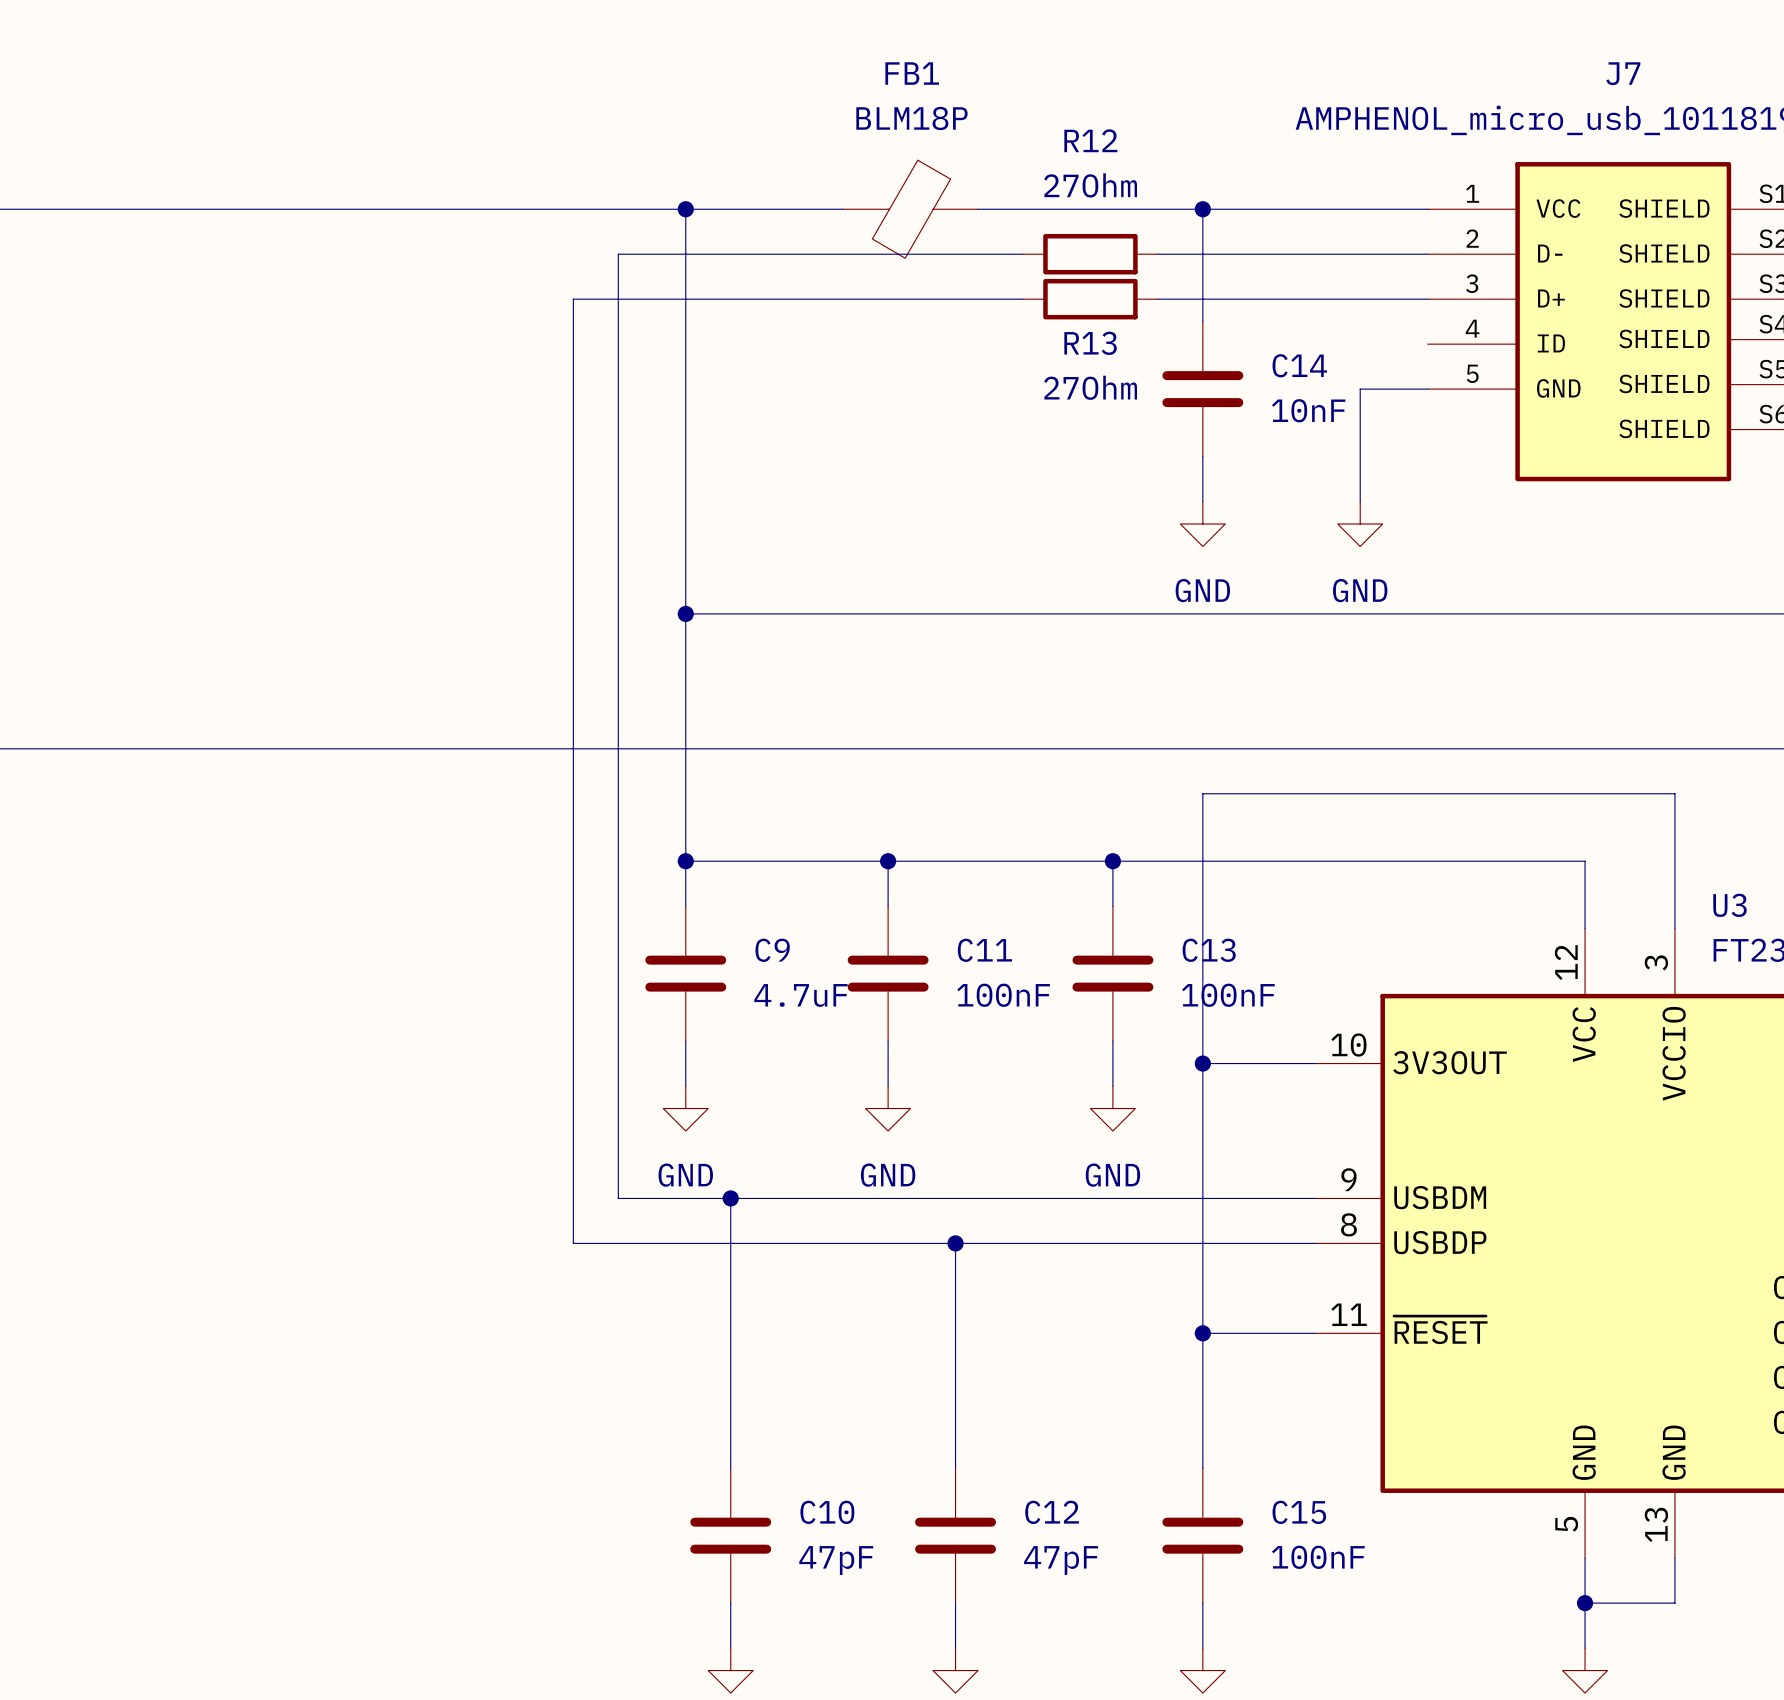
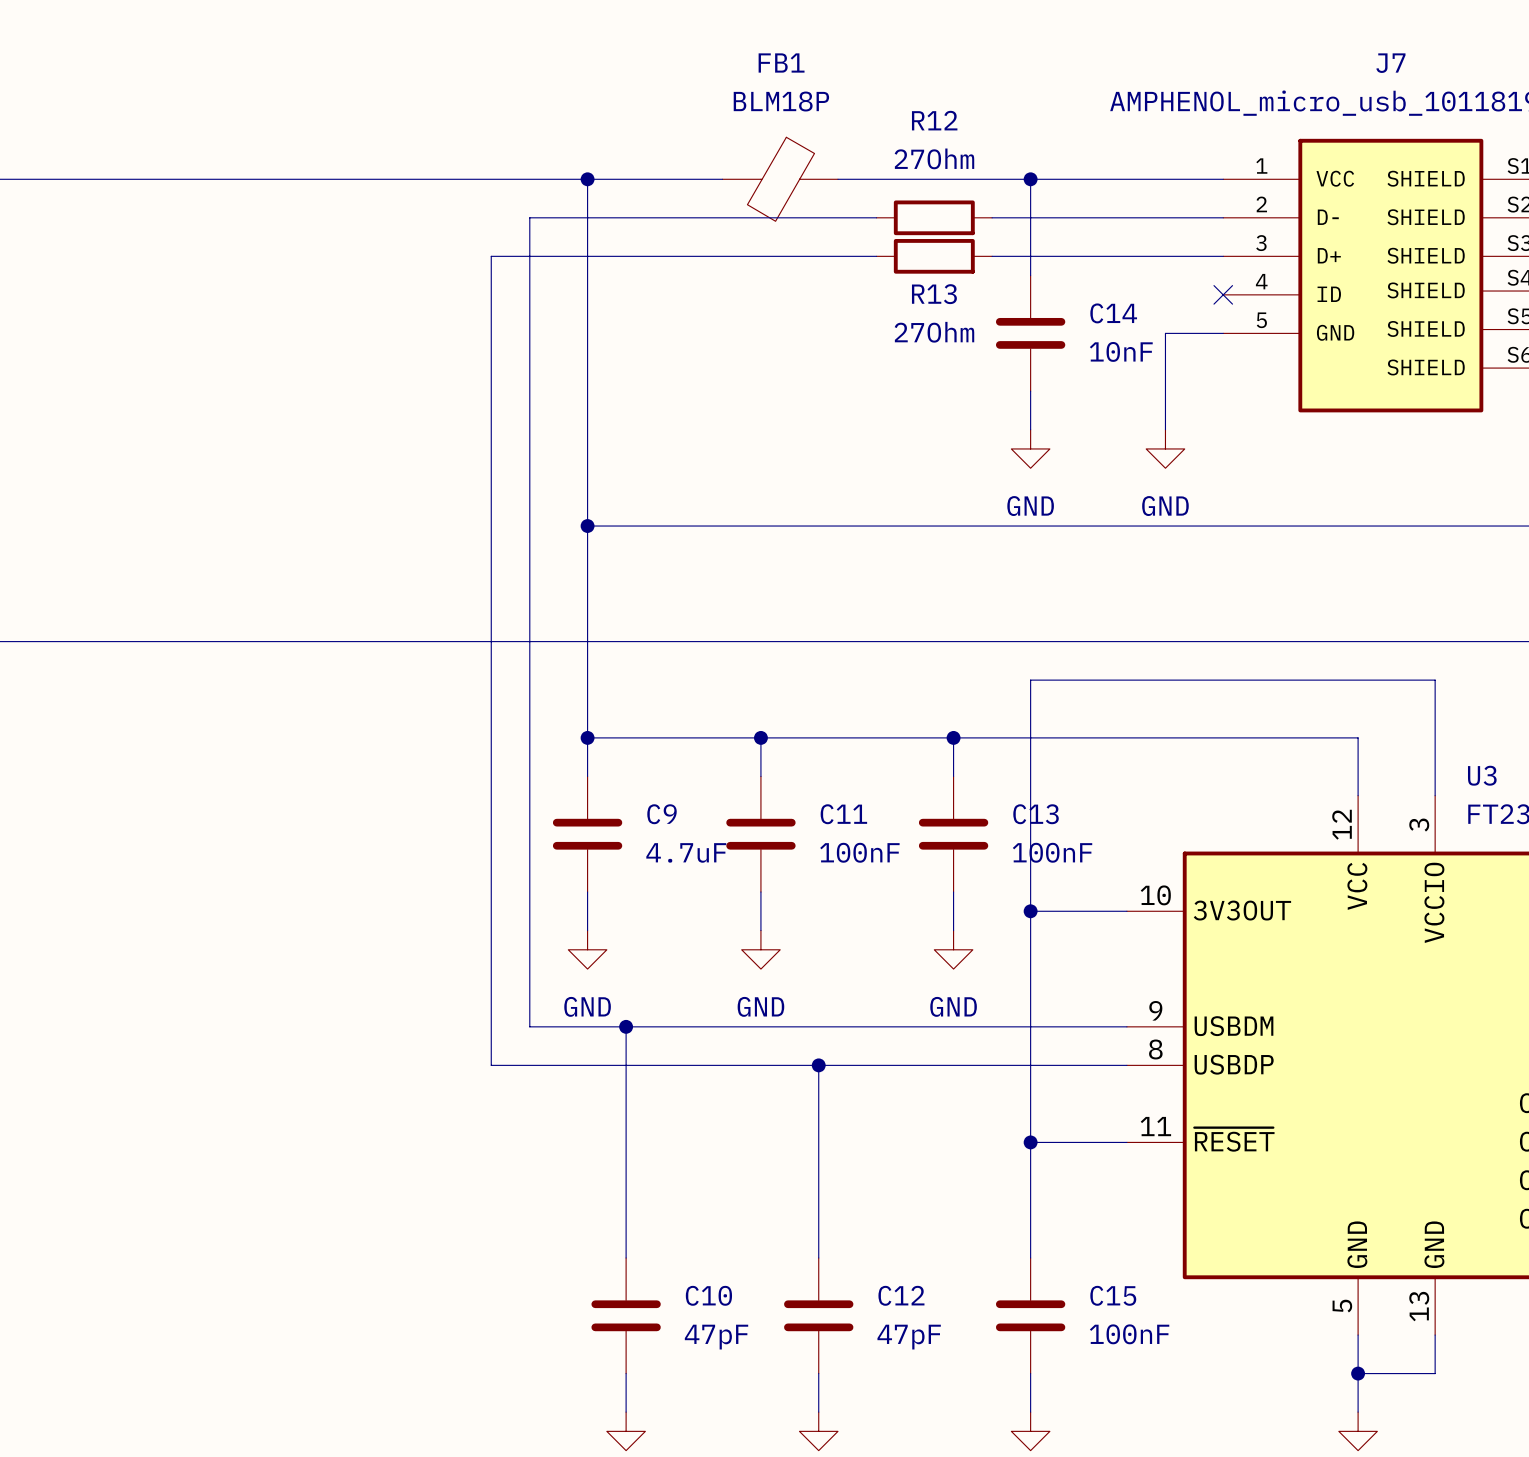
no-connect mark: none -> (1223, 294)

